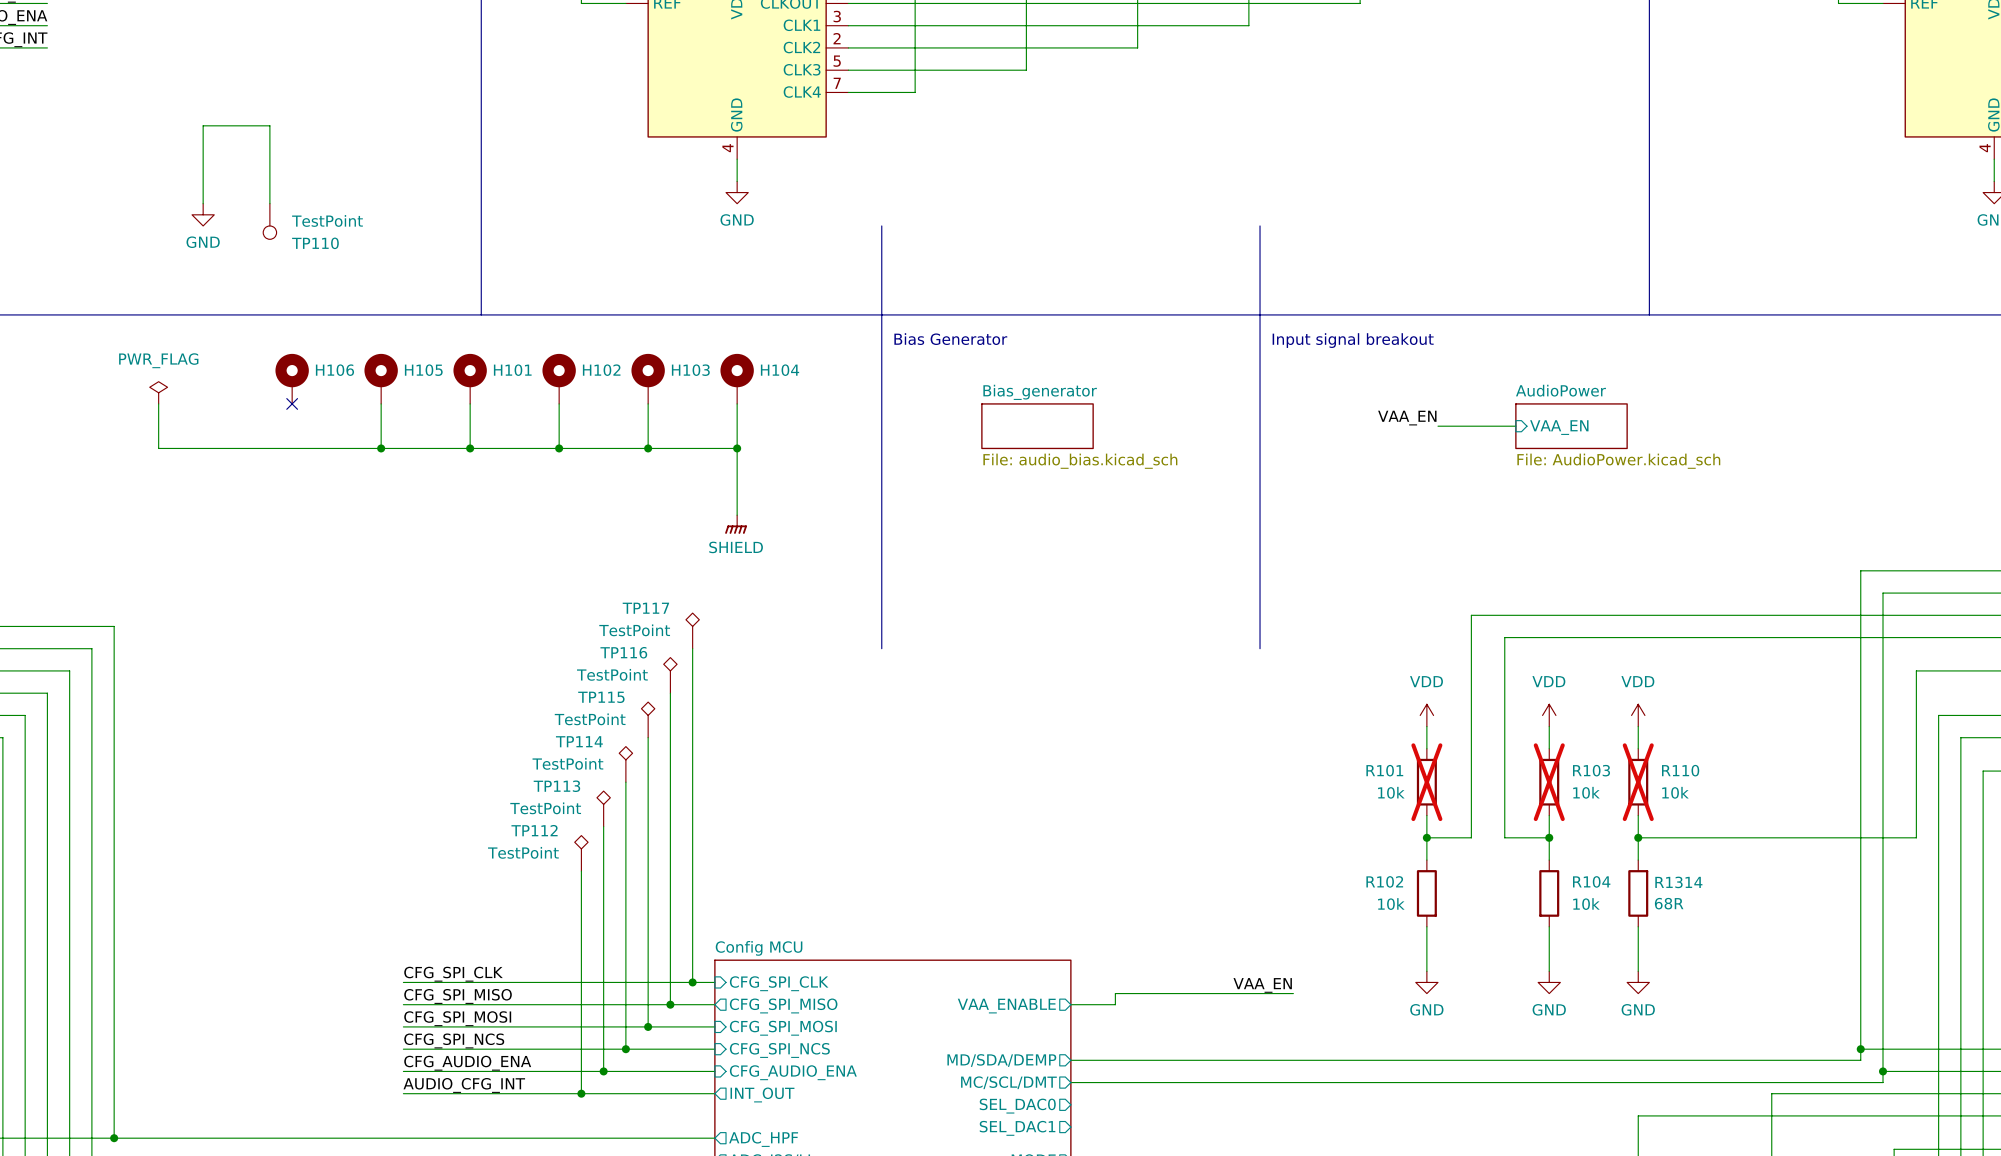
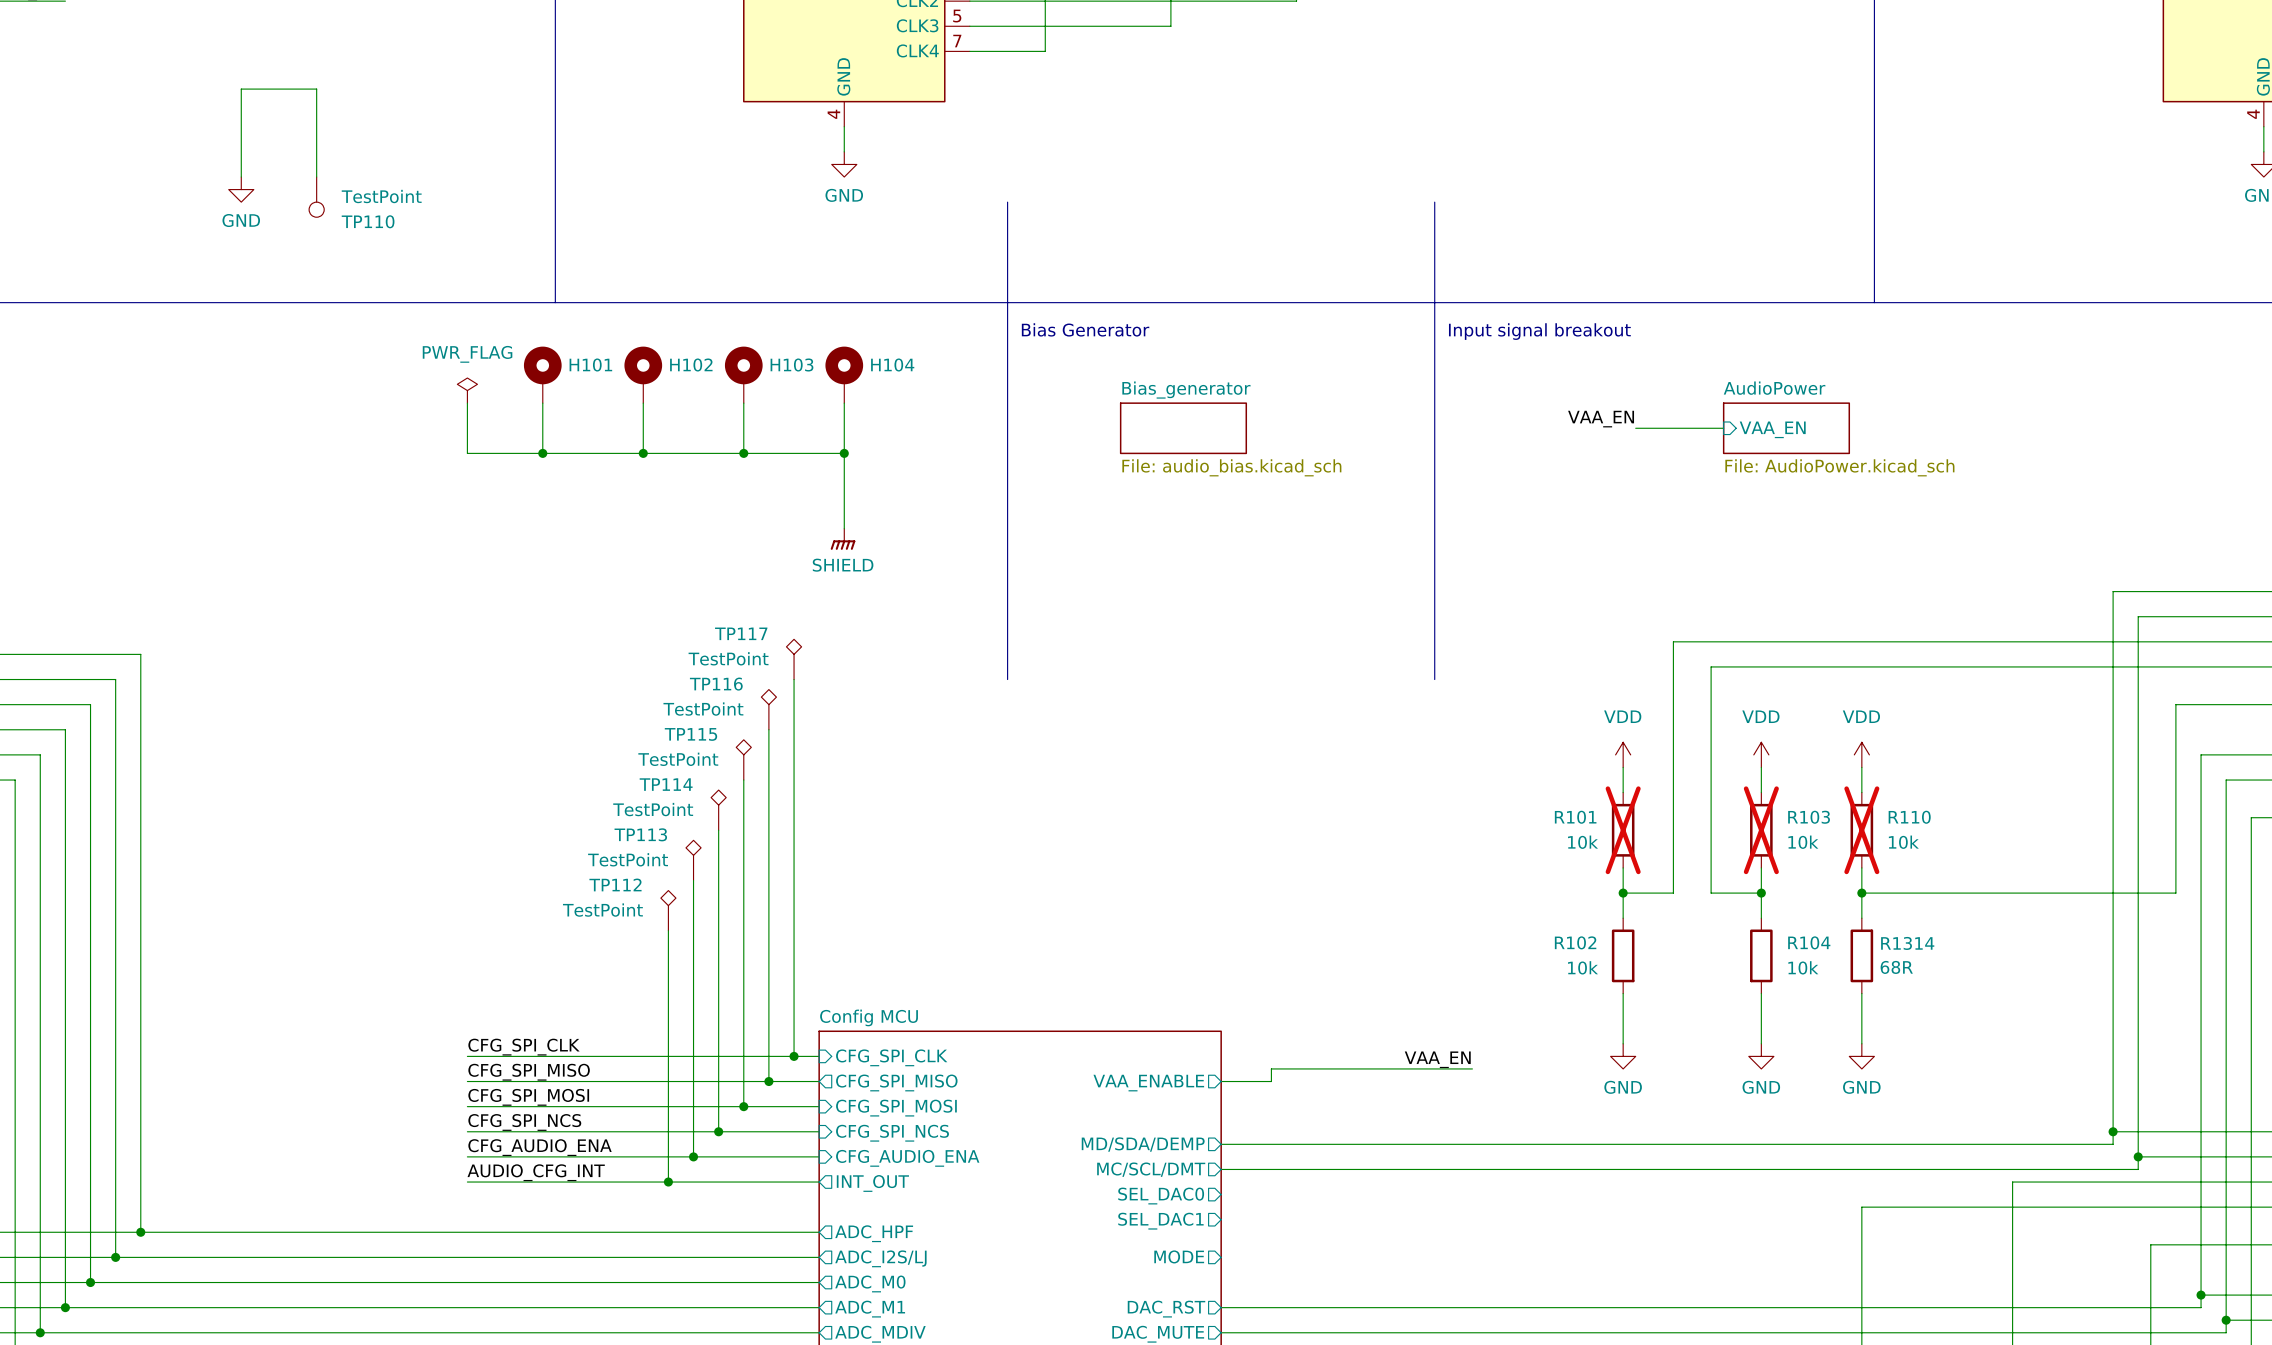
H106: (292, 378) -> none
H105: (381, 378) -> none
power symbol: PWR_FLAG (158, 392) -> none
power symbol: none -> PWR_FLAG (467, 390)
wire: (158, 403) (158, 448) (403, 448) -> (467, 403) (467, 453)
no-connect mark: (292, 403) -> none
wire: (381, 403) (381, 448) -> none
junction: (381, 448) -> none

